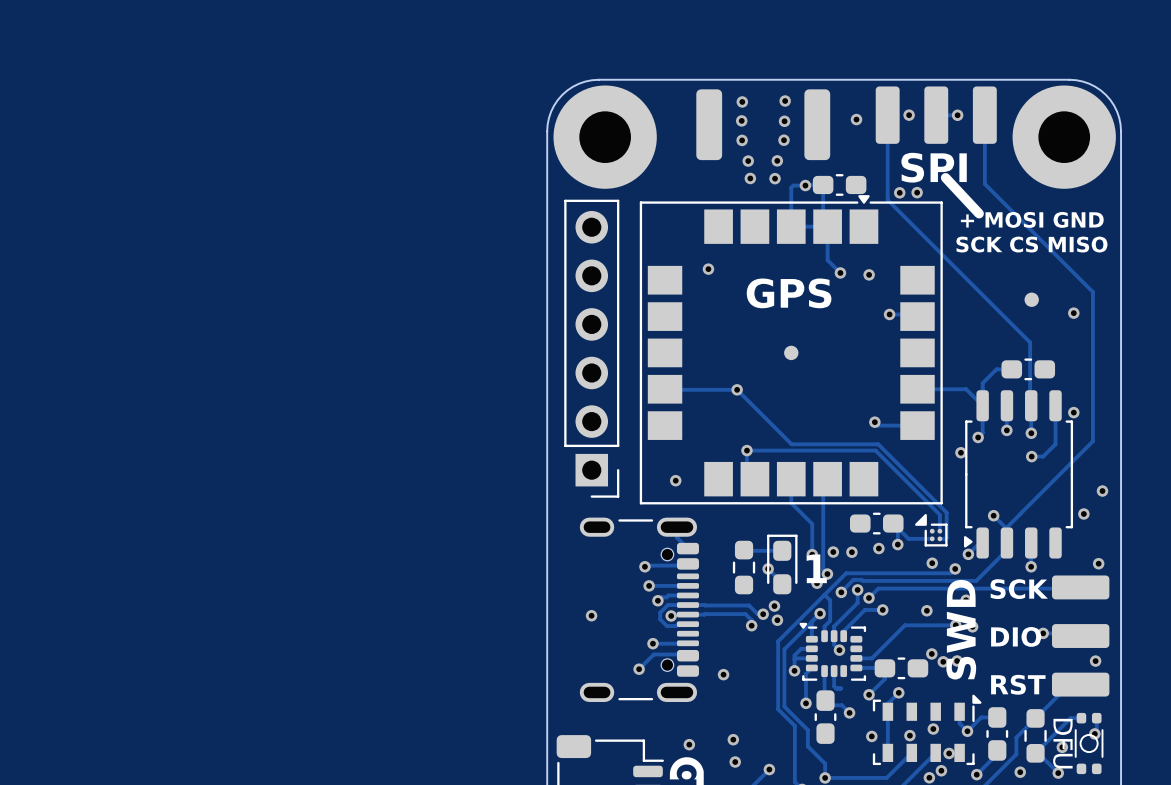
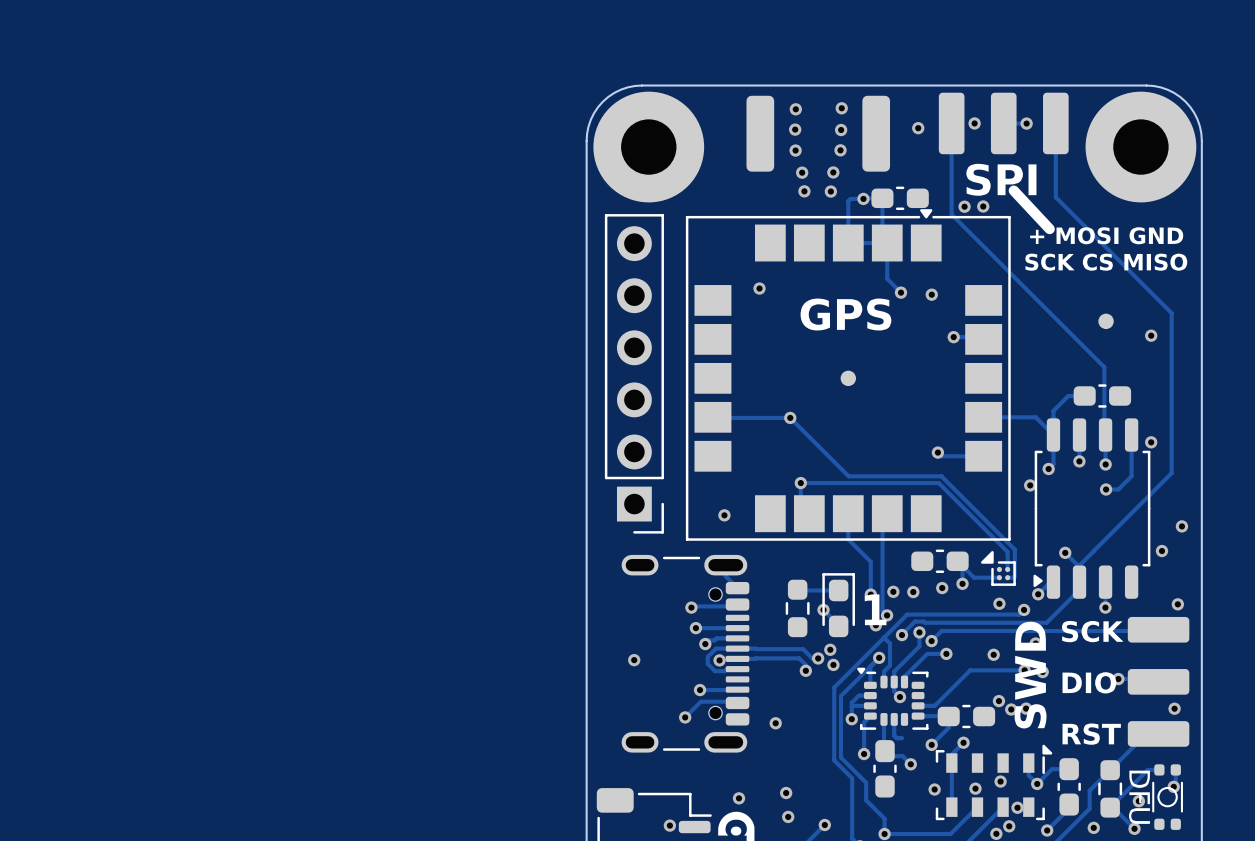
via: none -> (669, 825)

